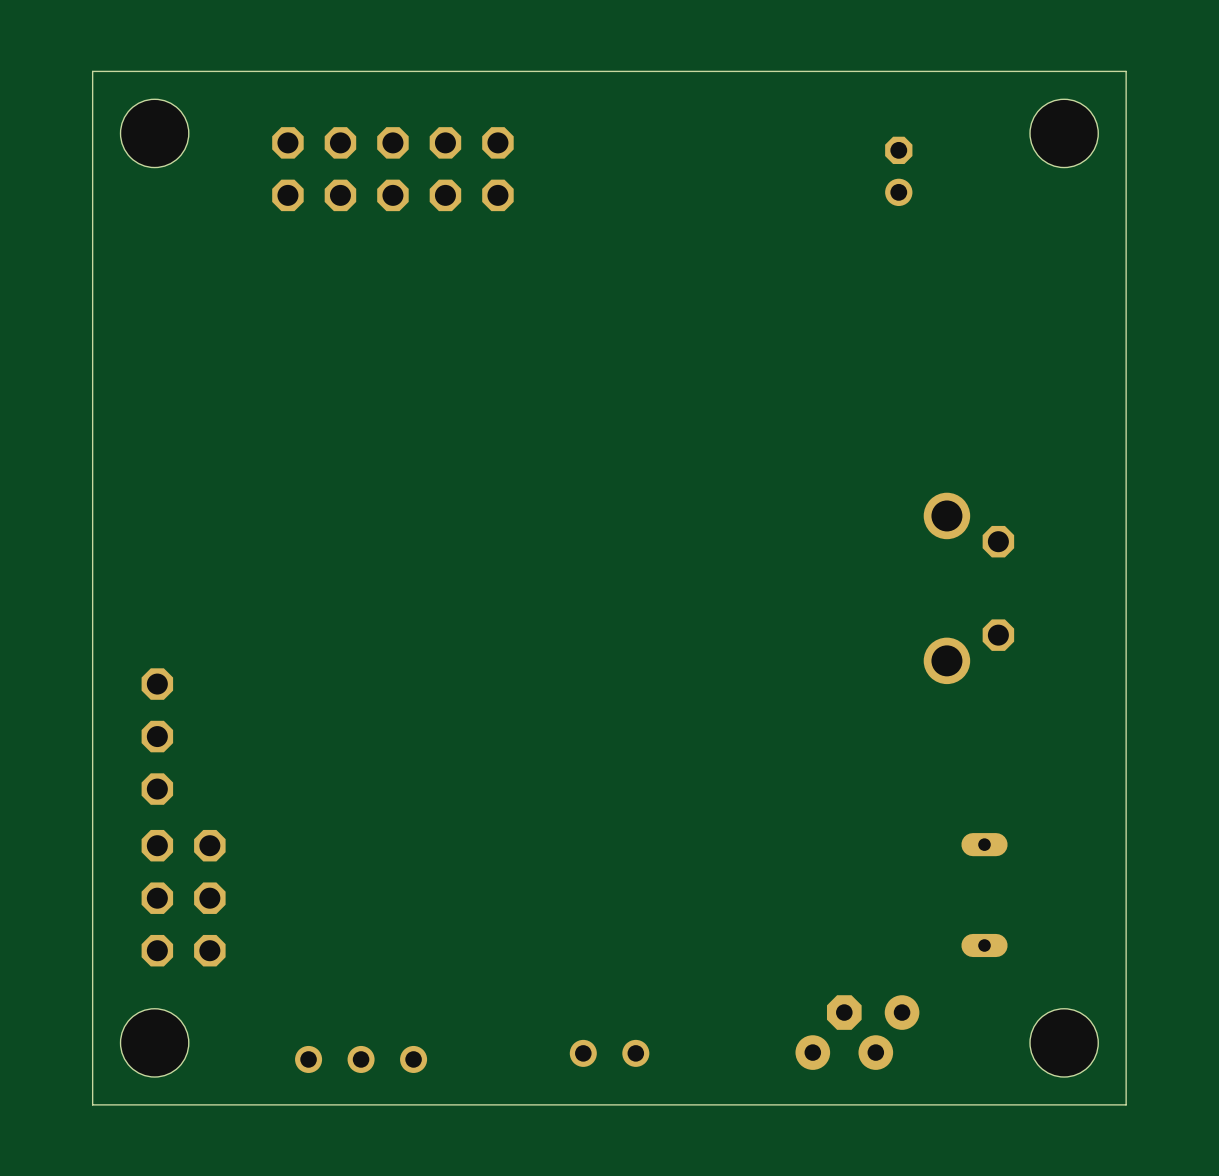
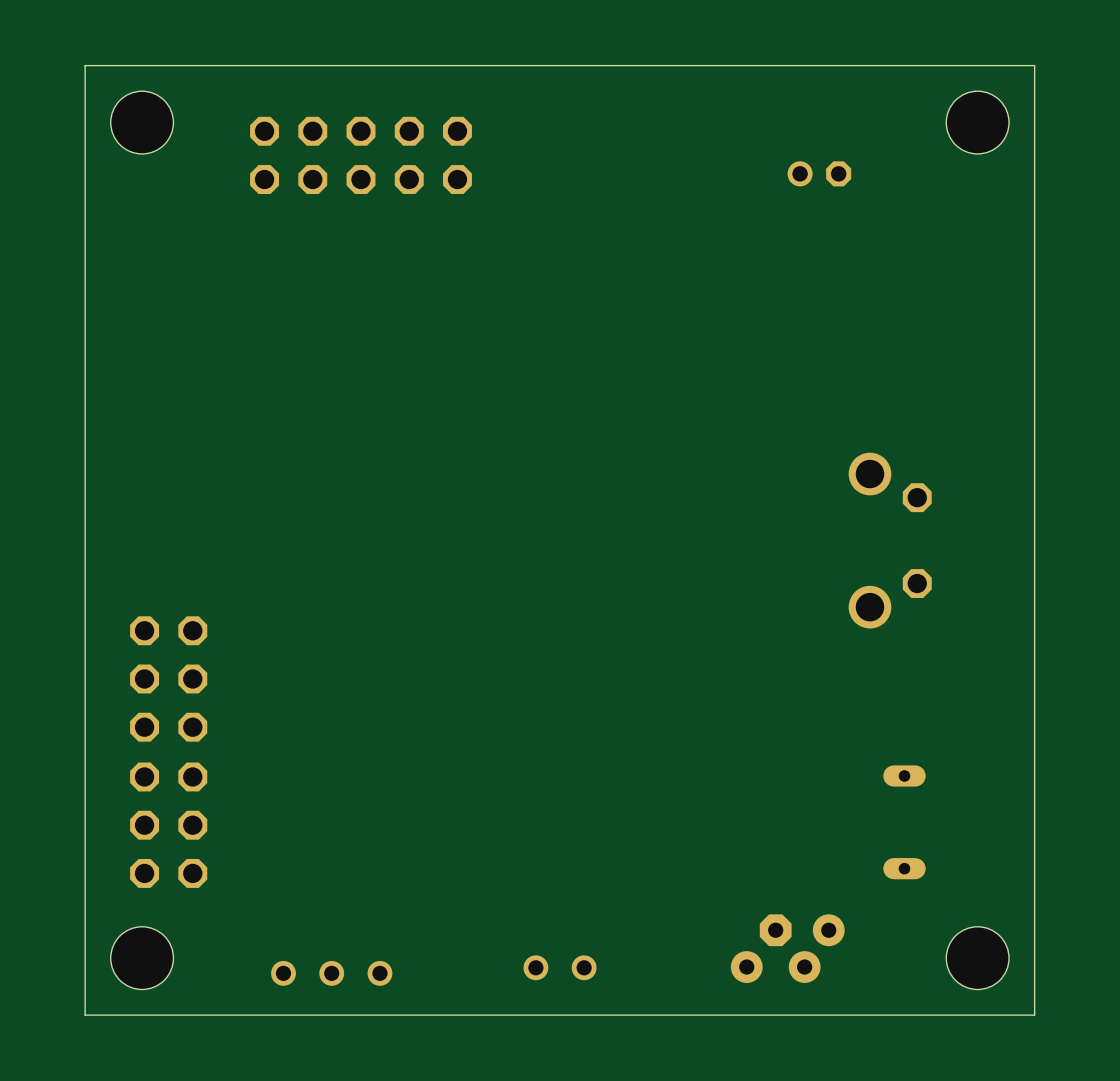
part rotation: 0° (898, 171) -> 90° clockwise (819, 173)
part: (157, 736) -> none
part: none -> (168, 678)

